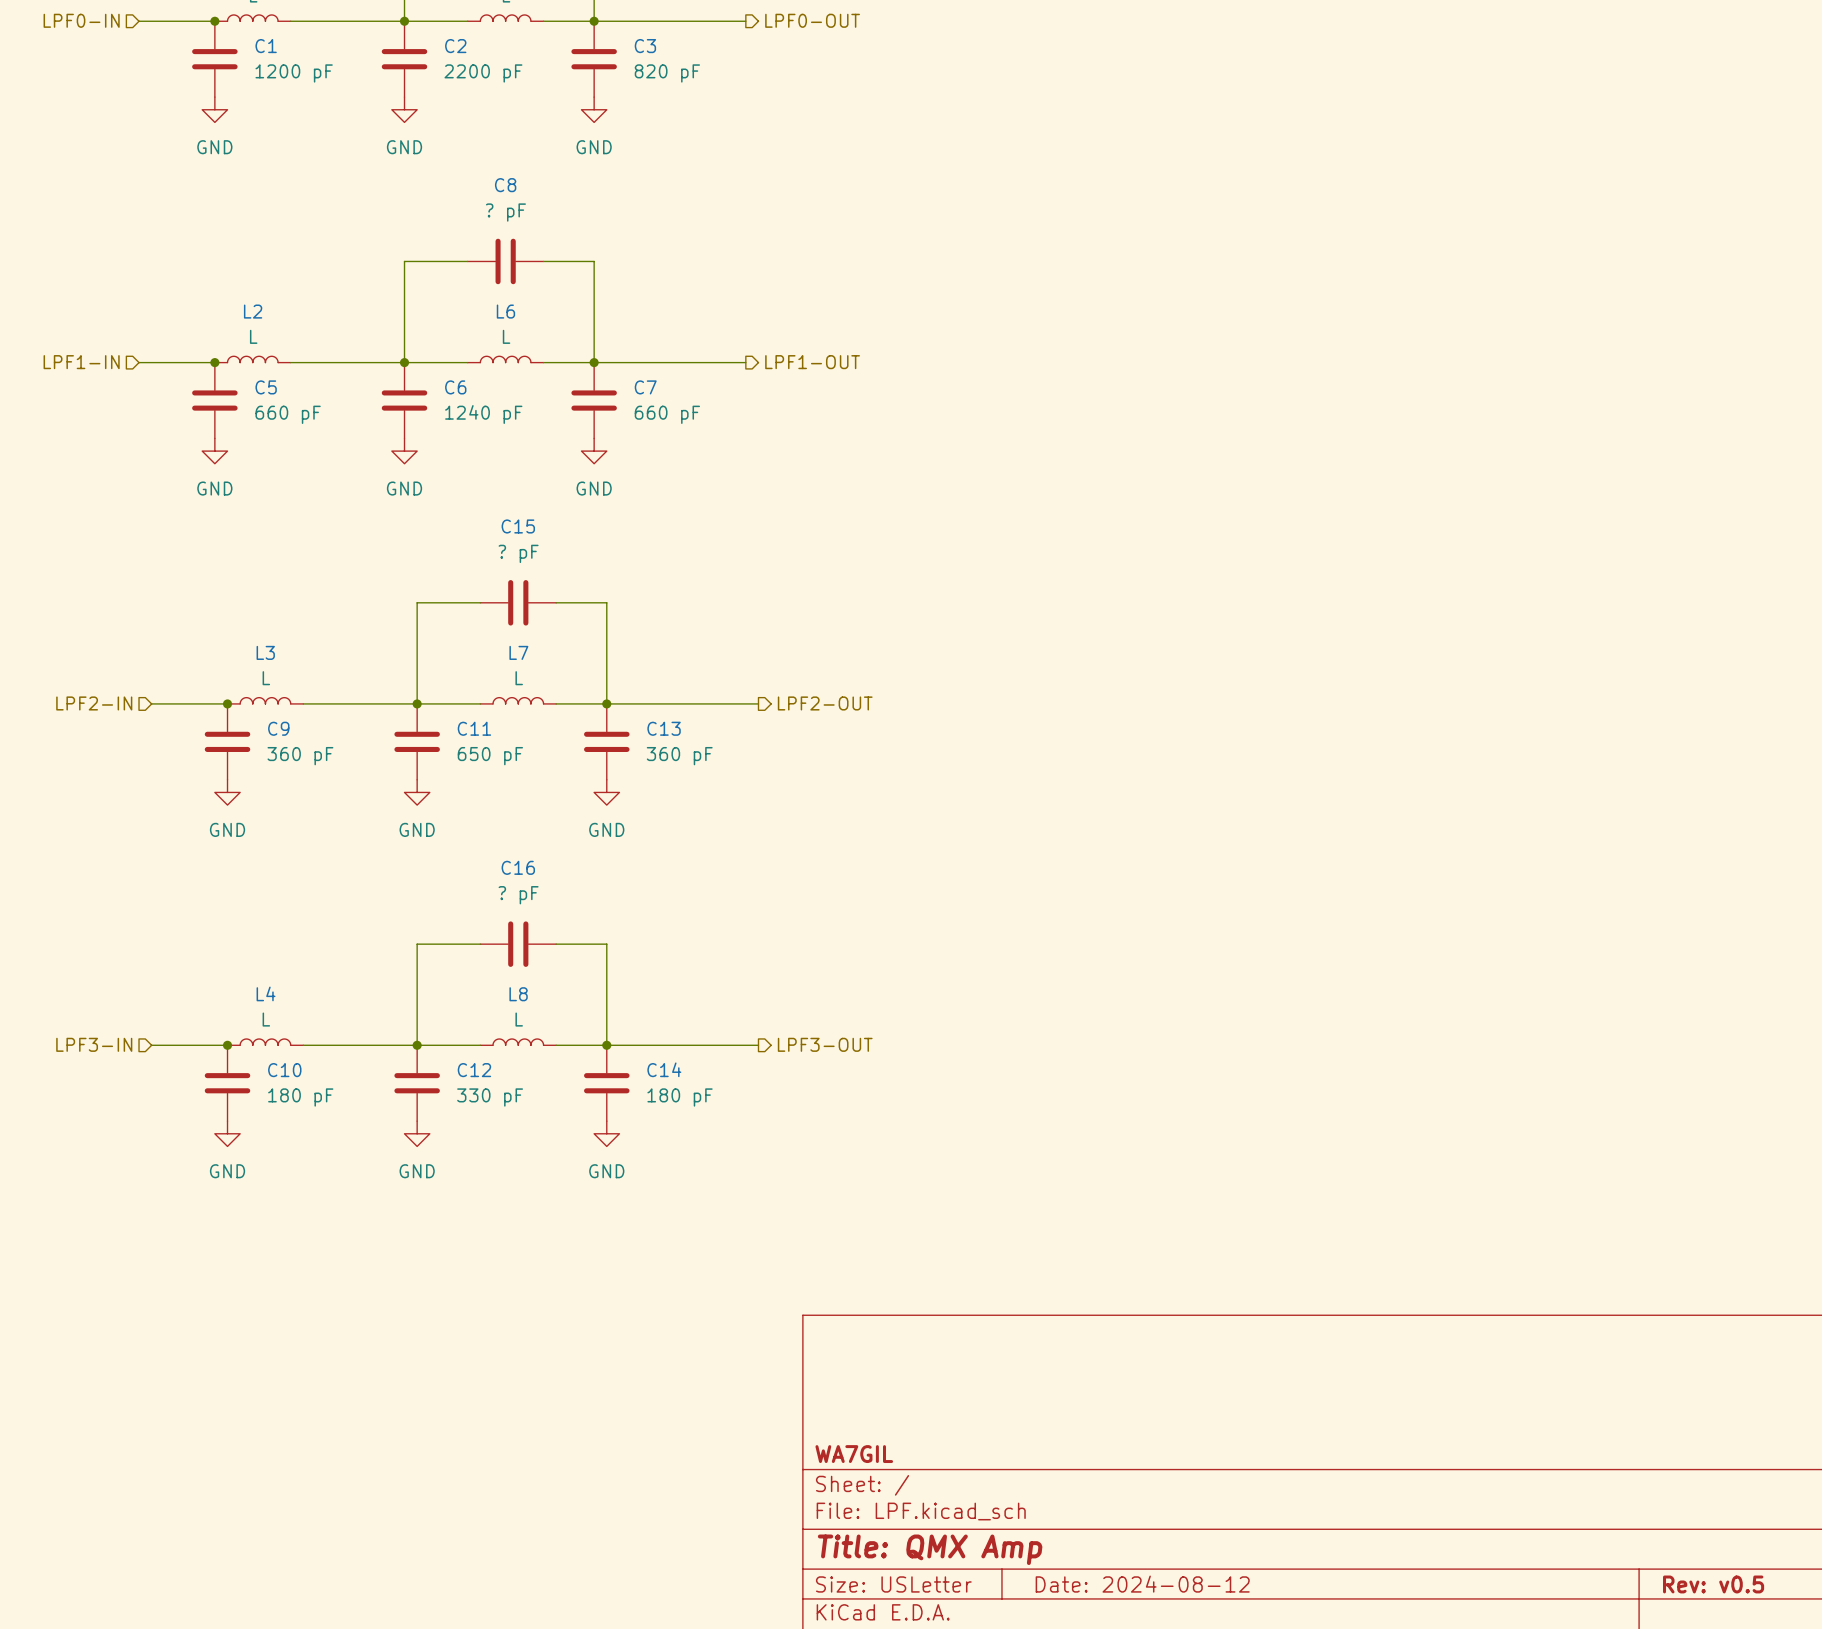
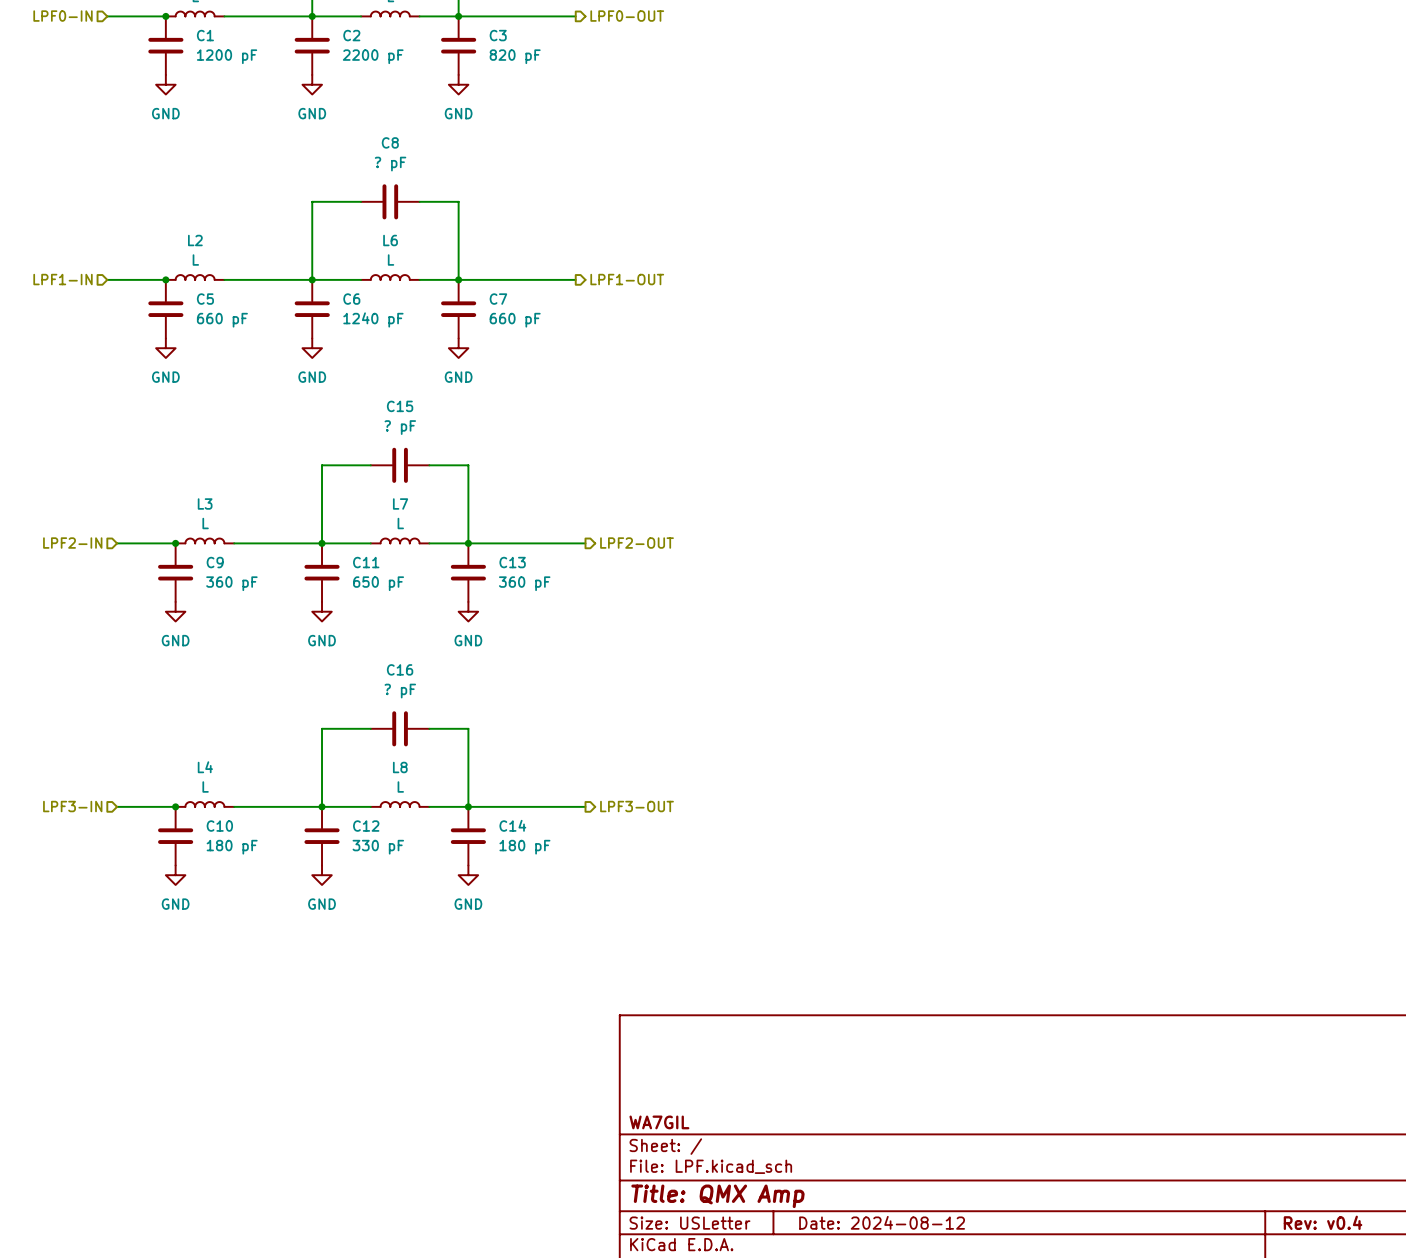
title block: Rev: v0.5 (1713, 1584) -> Rev: v0.4 (1323, 1222)

